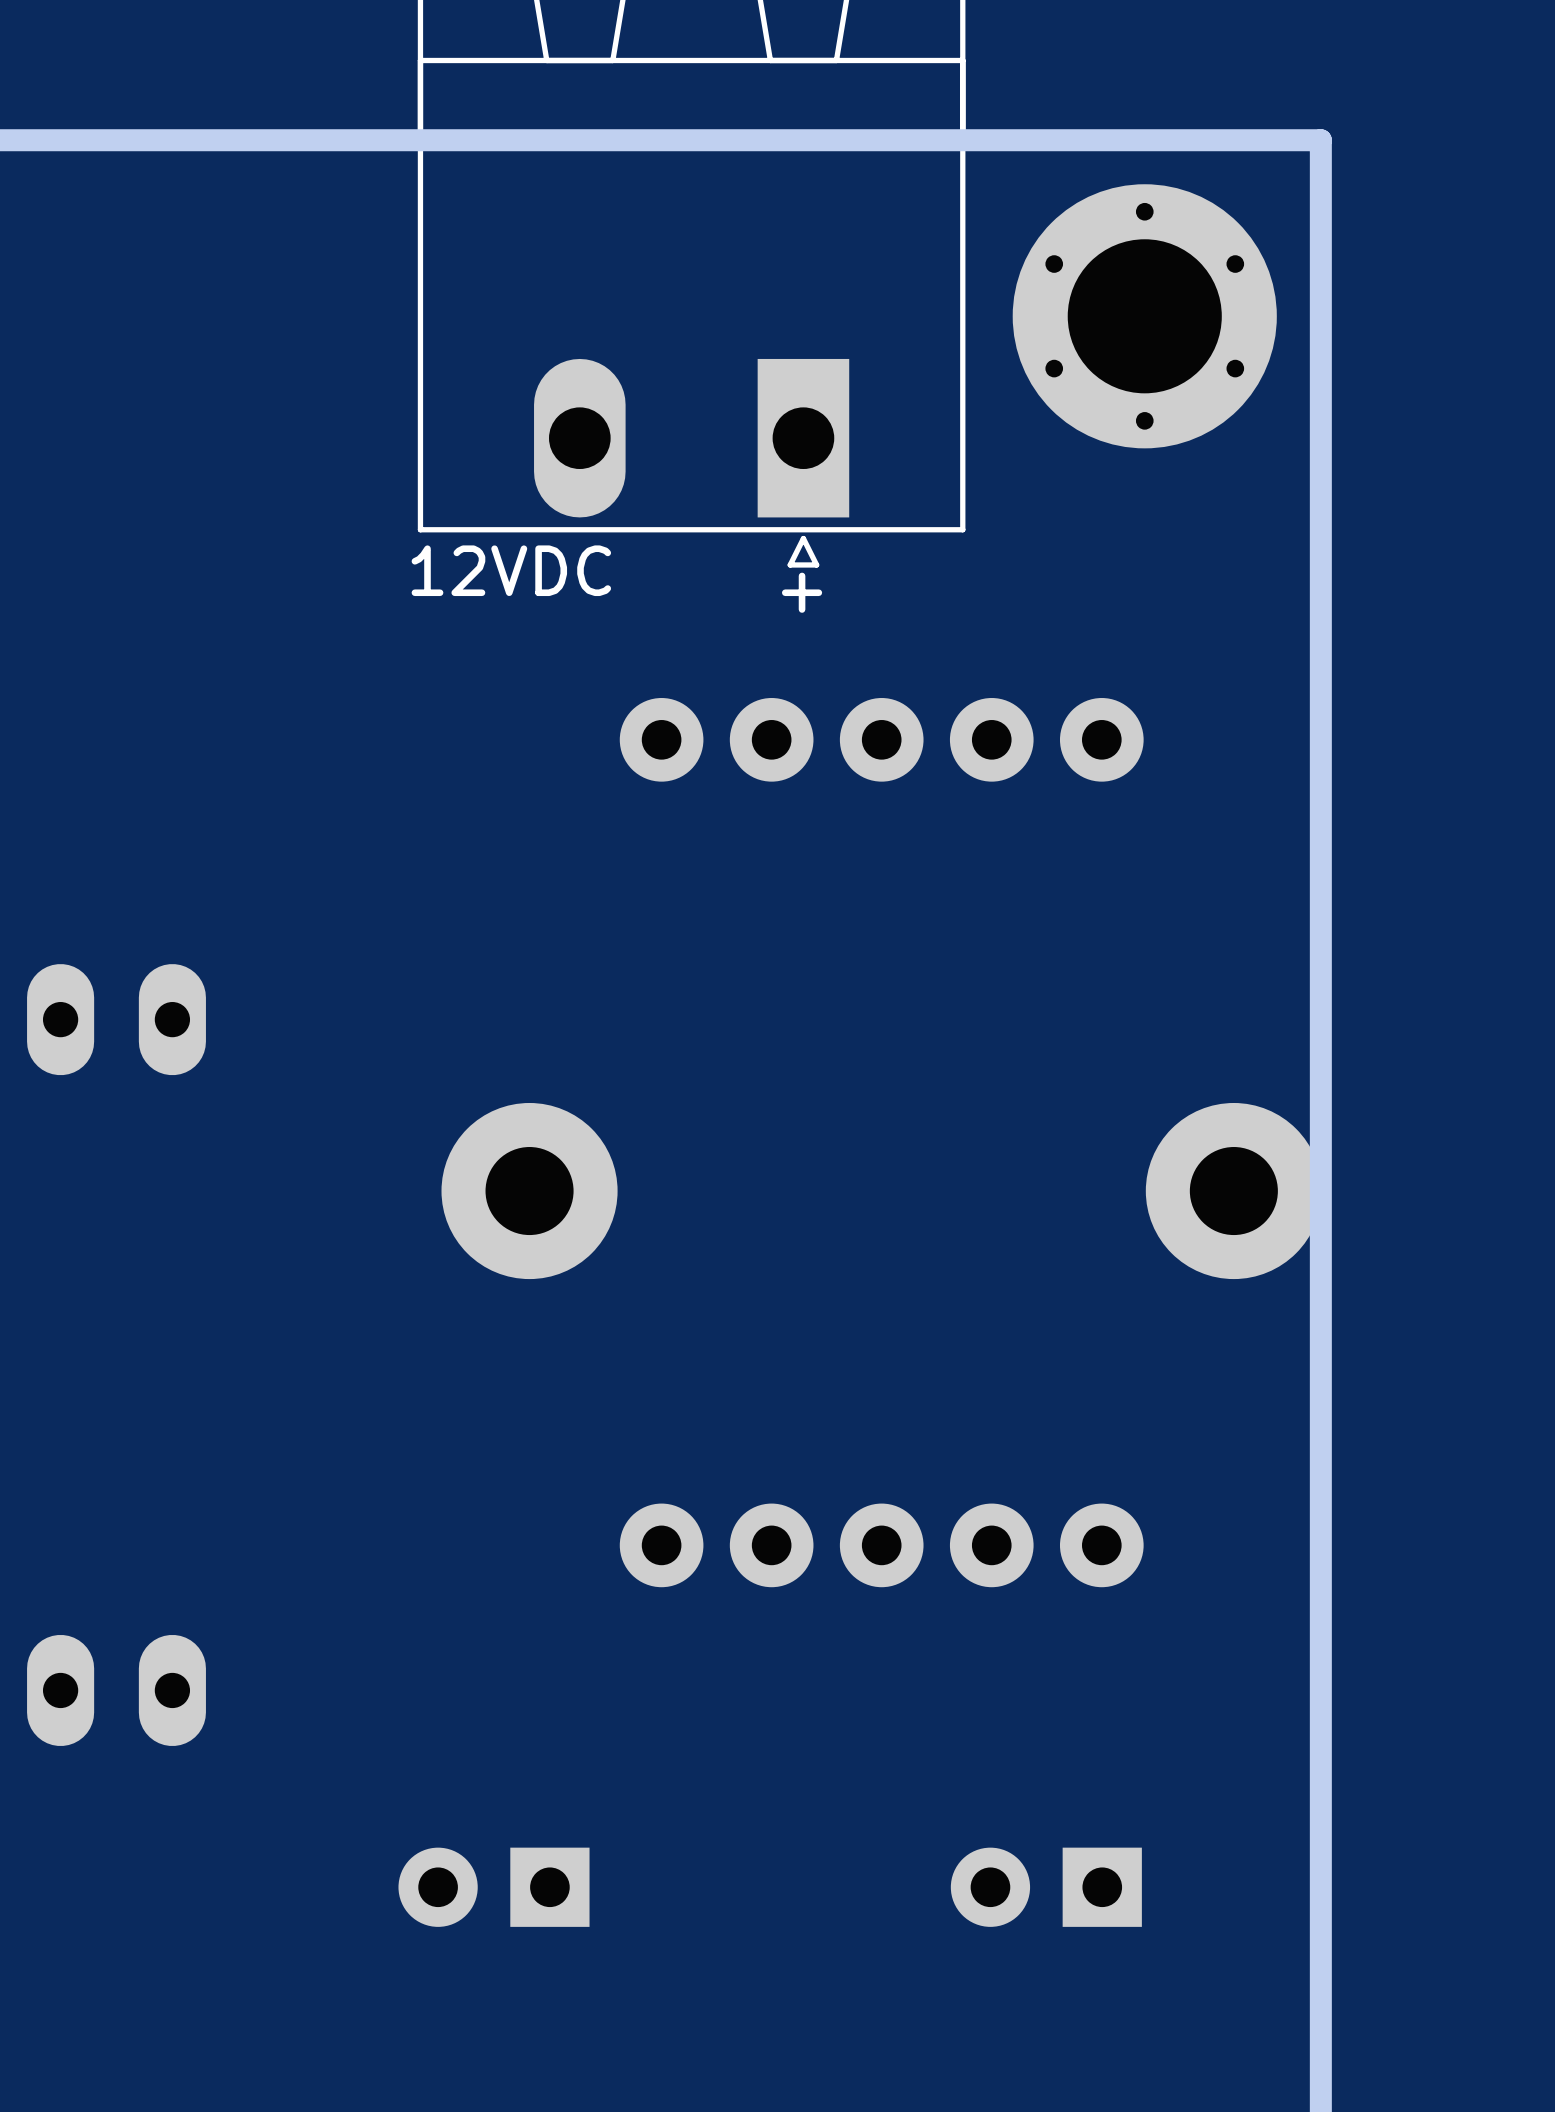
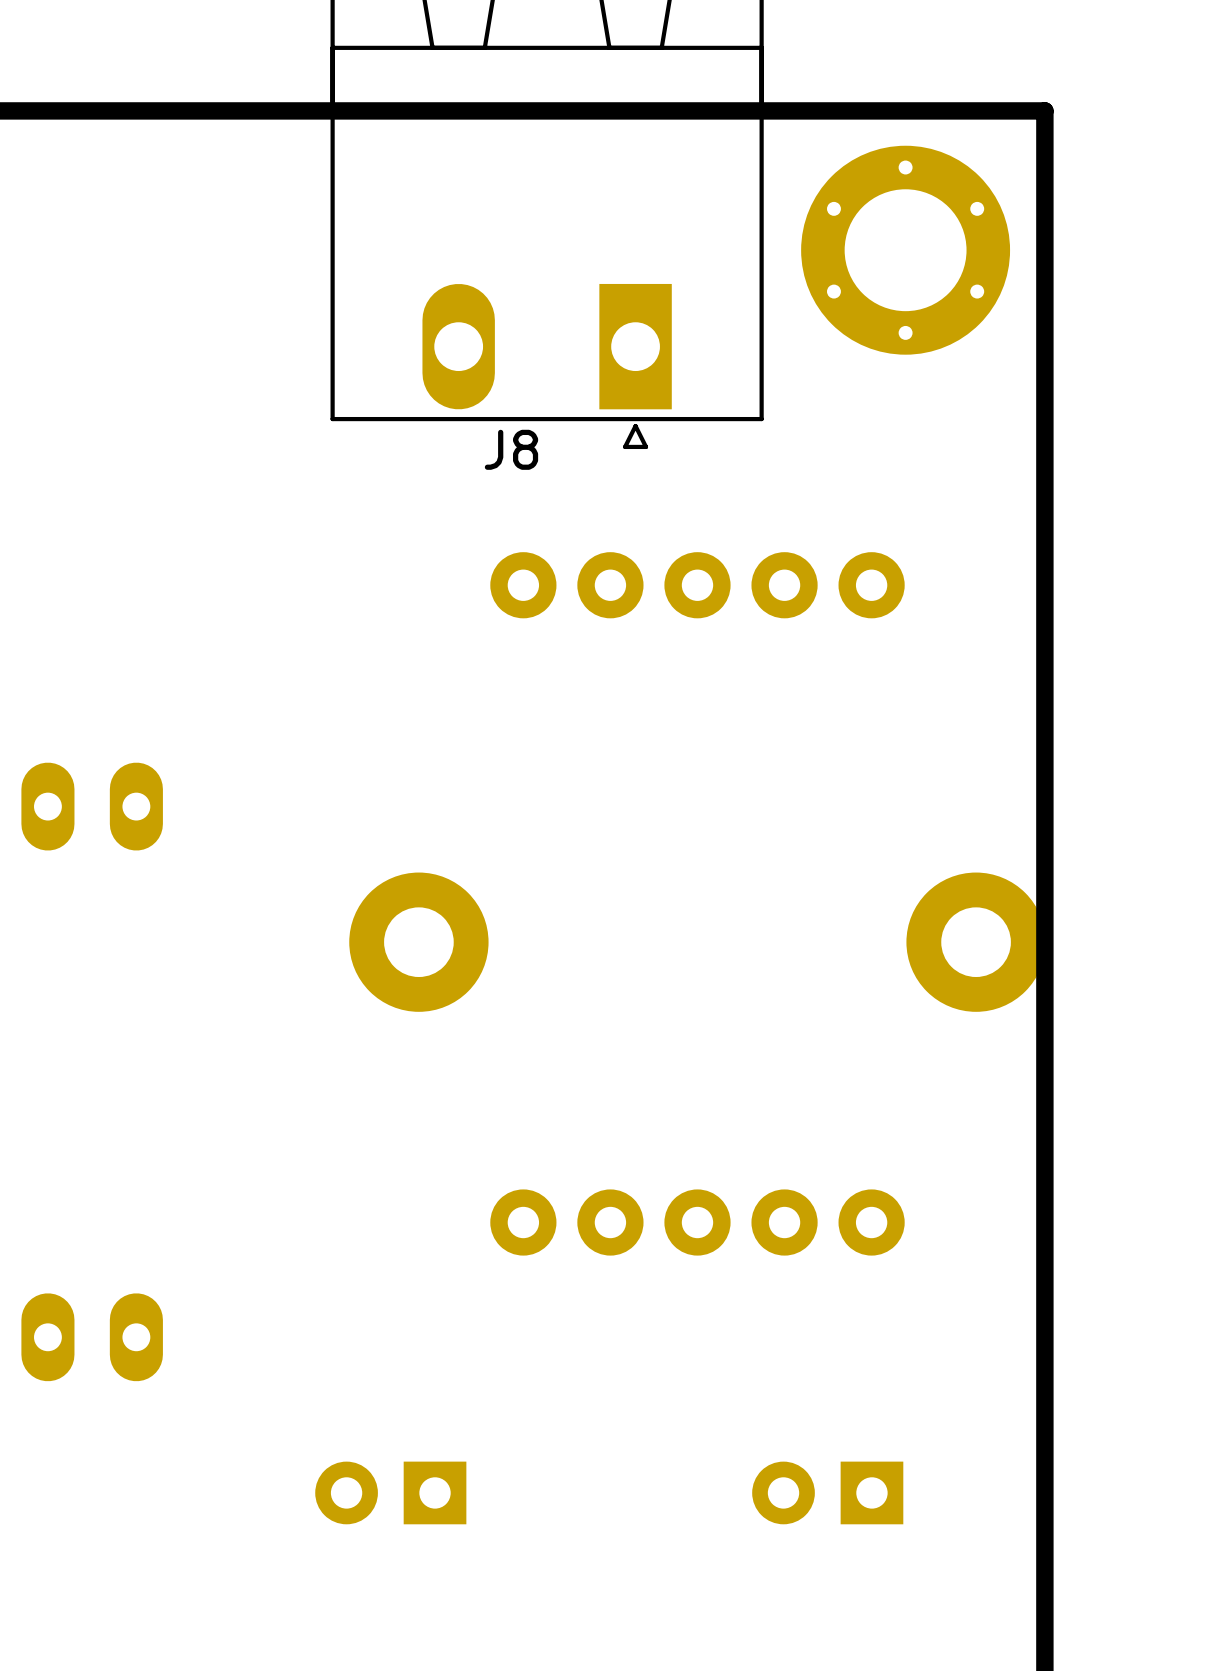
J8 name: none -> J8 (511, 449)
text: 12VDC (511, 570) -> none
text: + (802, 592) -> none

